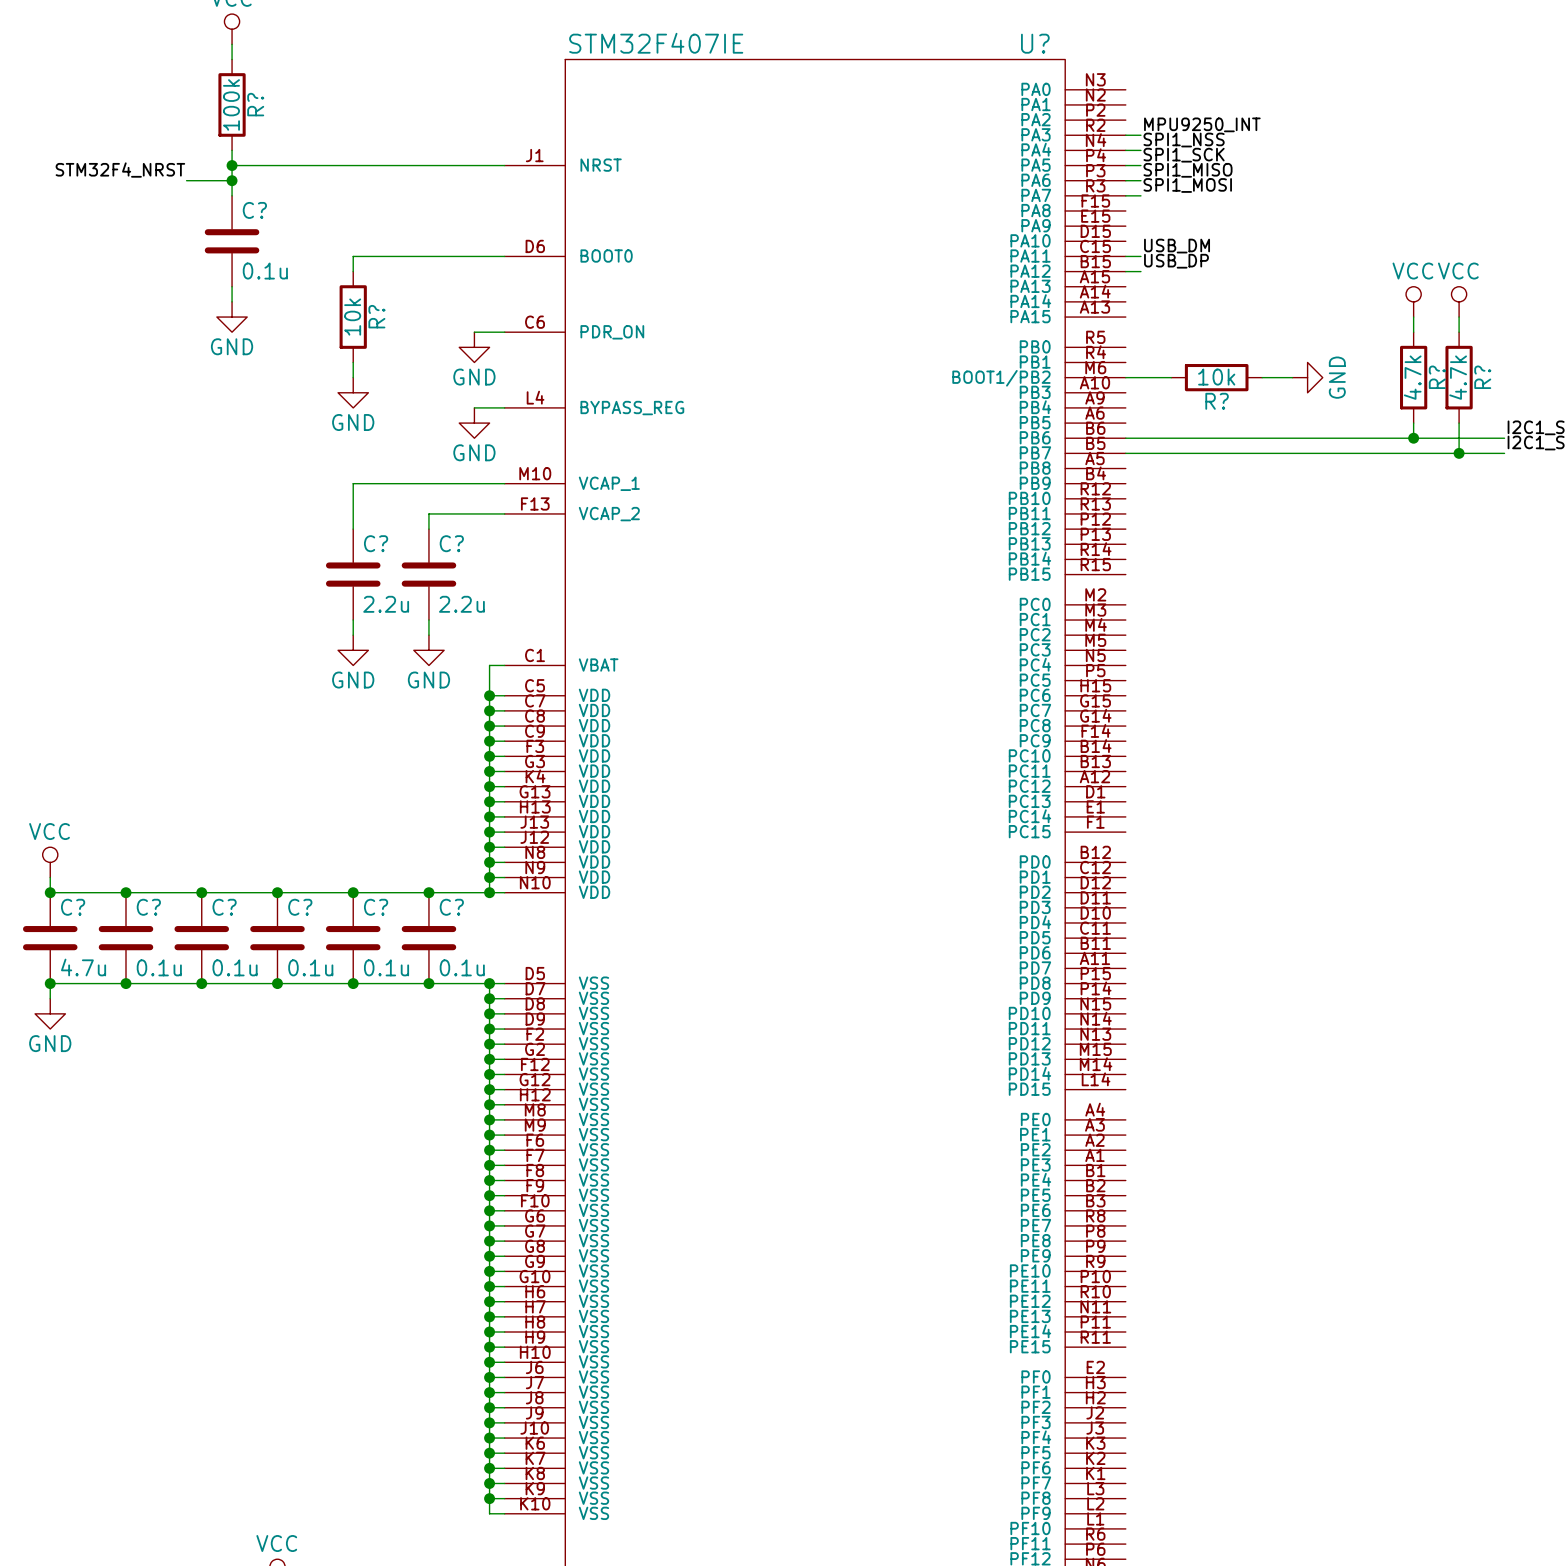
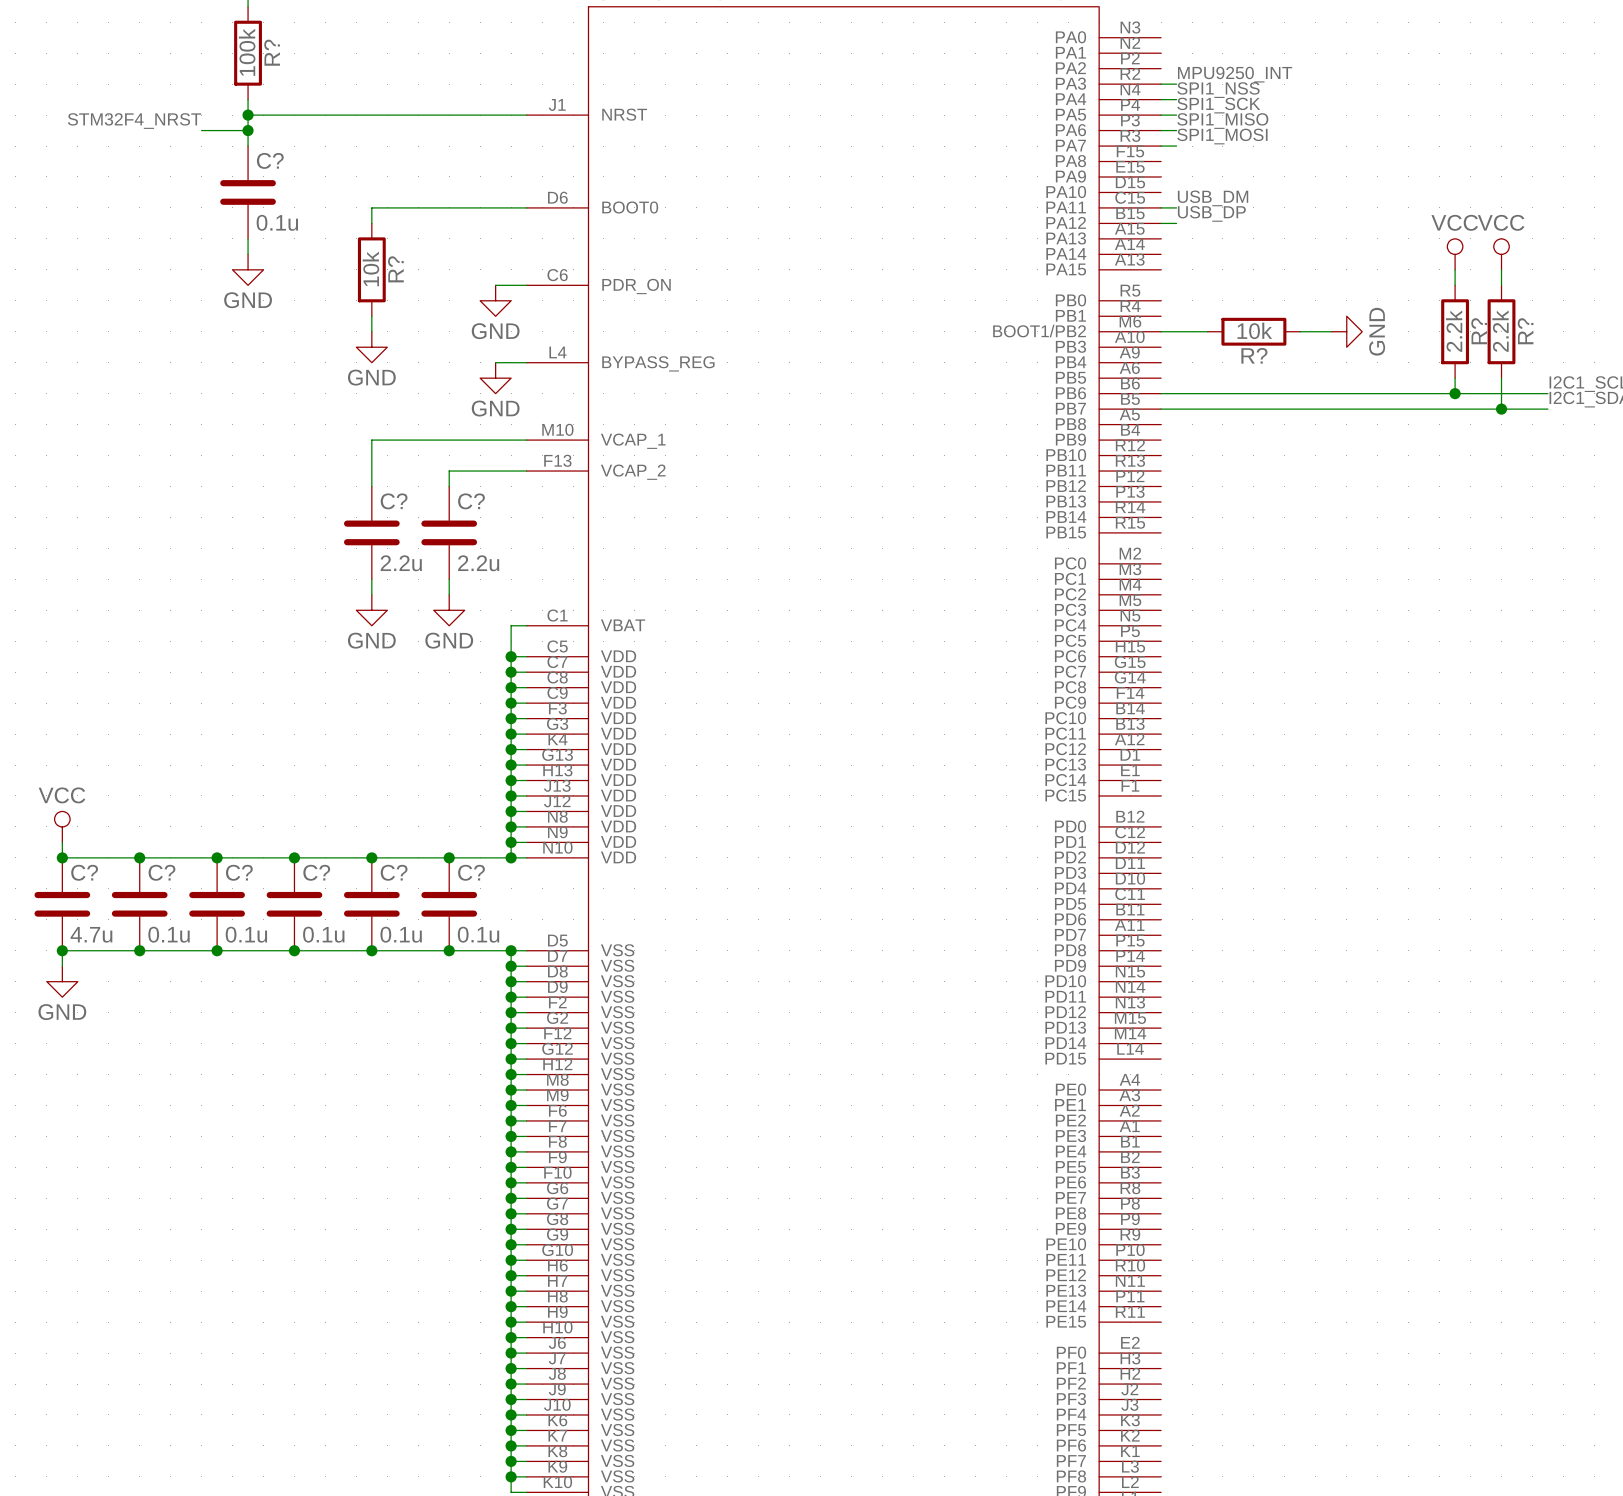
R? value: 4.7k (1412, 377) -> 2.2k (1454, 331)
R? value: 4.7k (1458, 377) -> 2.2k (1500, 331)

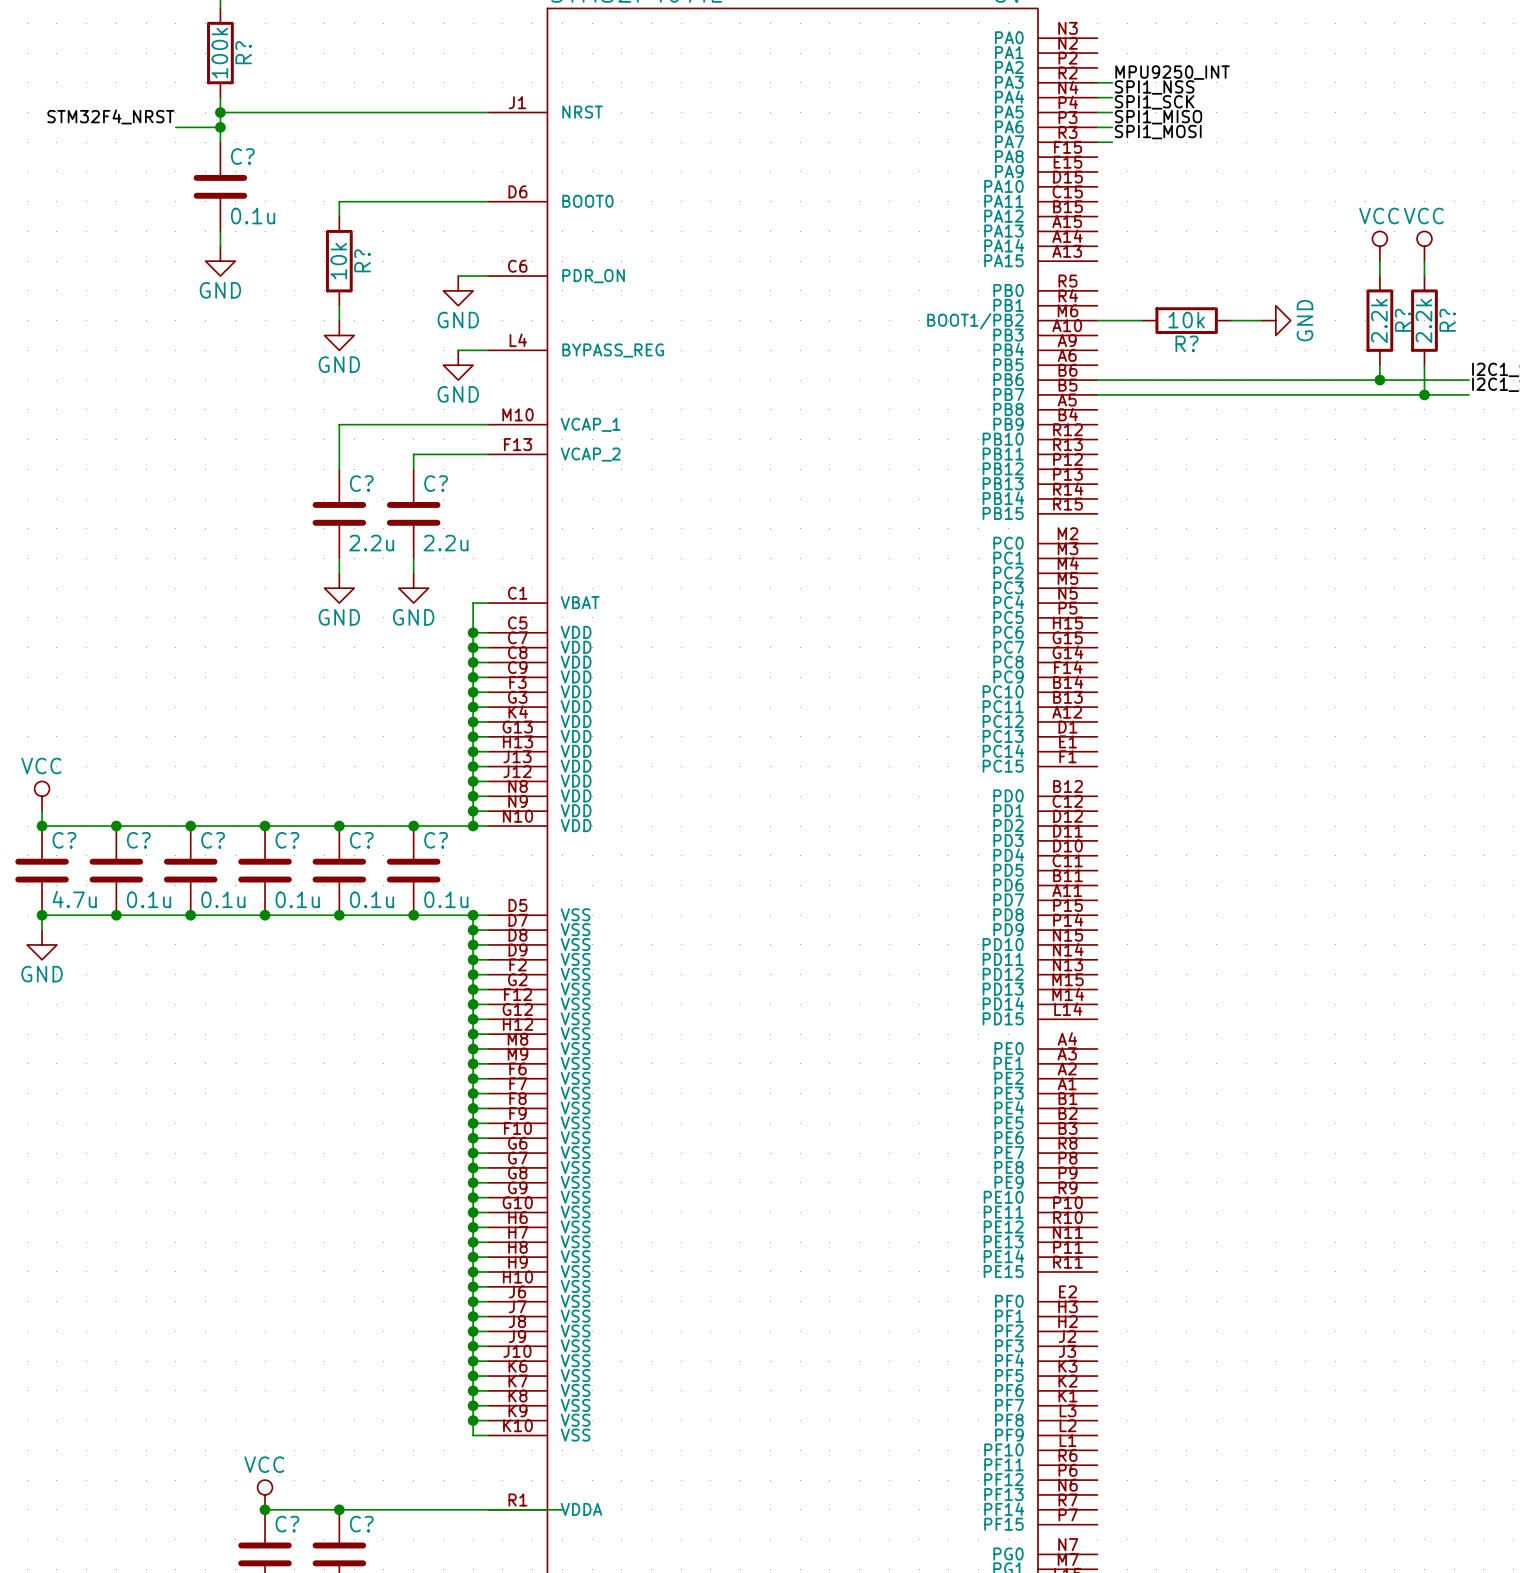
label: USB_DM (1213, 198) -> none
wire: (1161, 207) (1176, 207) -> none
label: USB_DP (1211, 213) -> none
wire: (1161, 223) (1176, 223) -> none

